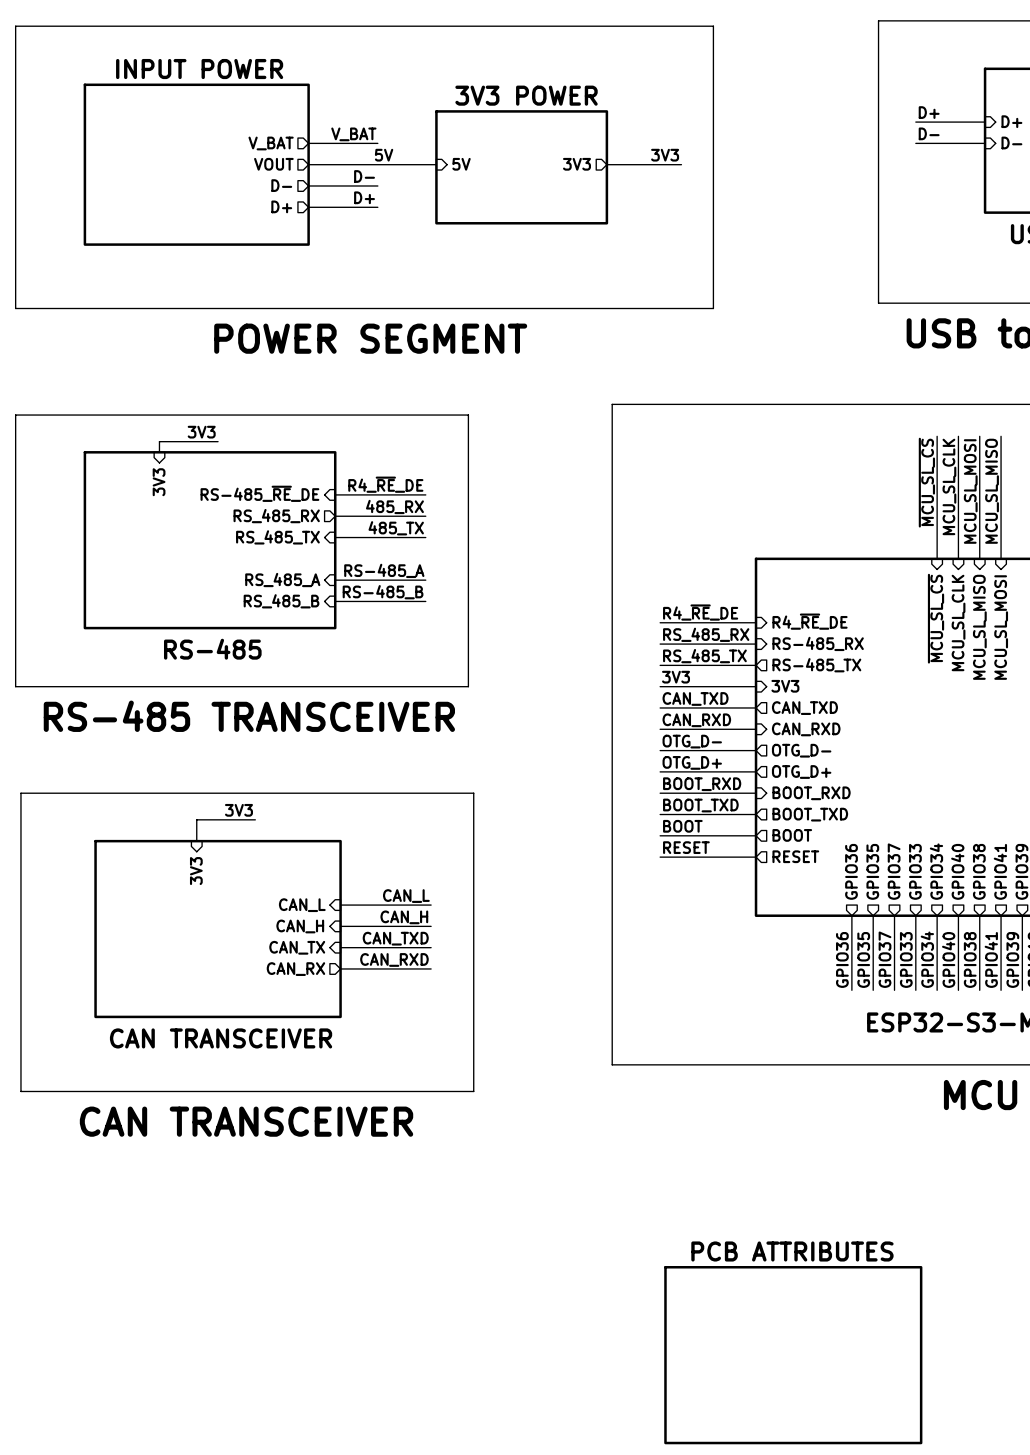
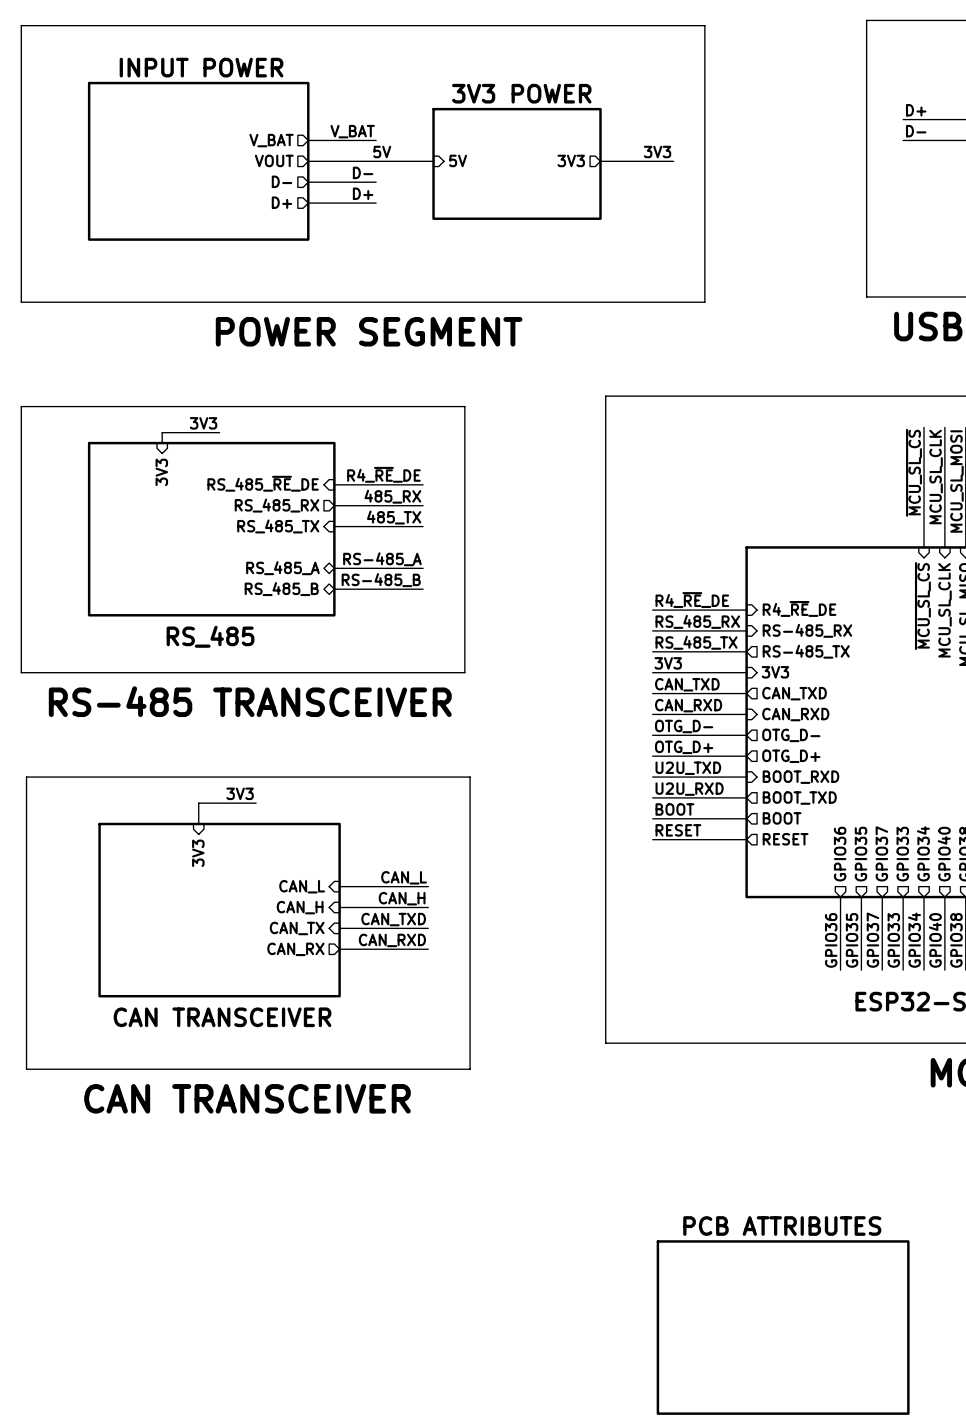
sheet pin: RS-485_~{RE}_DE (259, 493) -> RS_485_~{RE}_DE (263, 483)
sheet pin shape: input (282, 580) -> bidirectional (282, 568)
sheet pin shape: input (281, 601) -> bidirectional (281, 589)
sheet RS-485 name: RS-485 (212, 649) -> RS_485 (210, 636)
label: BOOT_RXD (702, 784) -> U2U_TXD (688, 768)
label: BOOT_TXD (700, 805) -> U2U_RXD (689, 789)

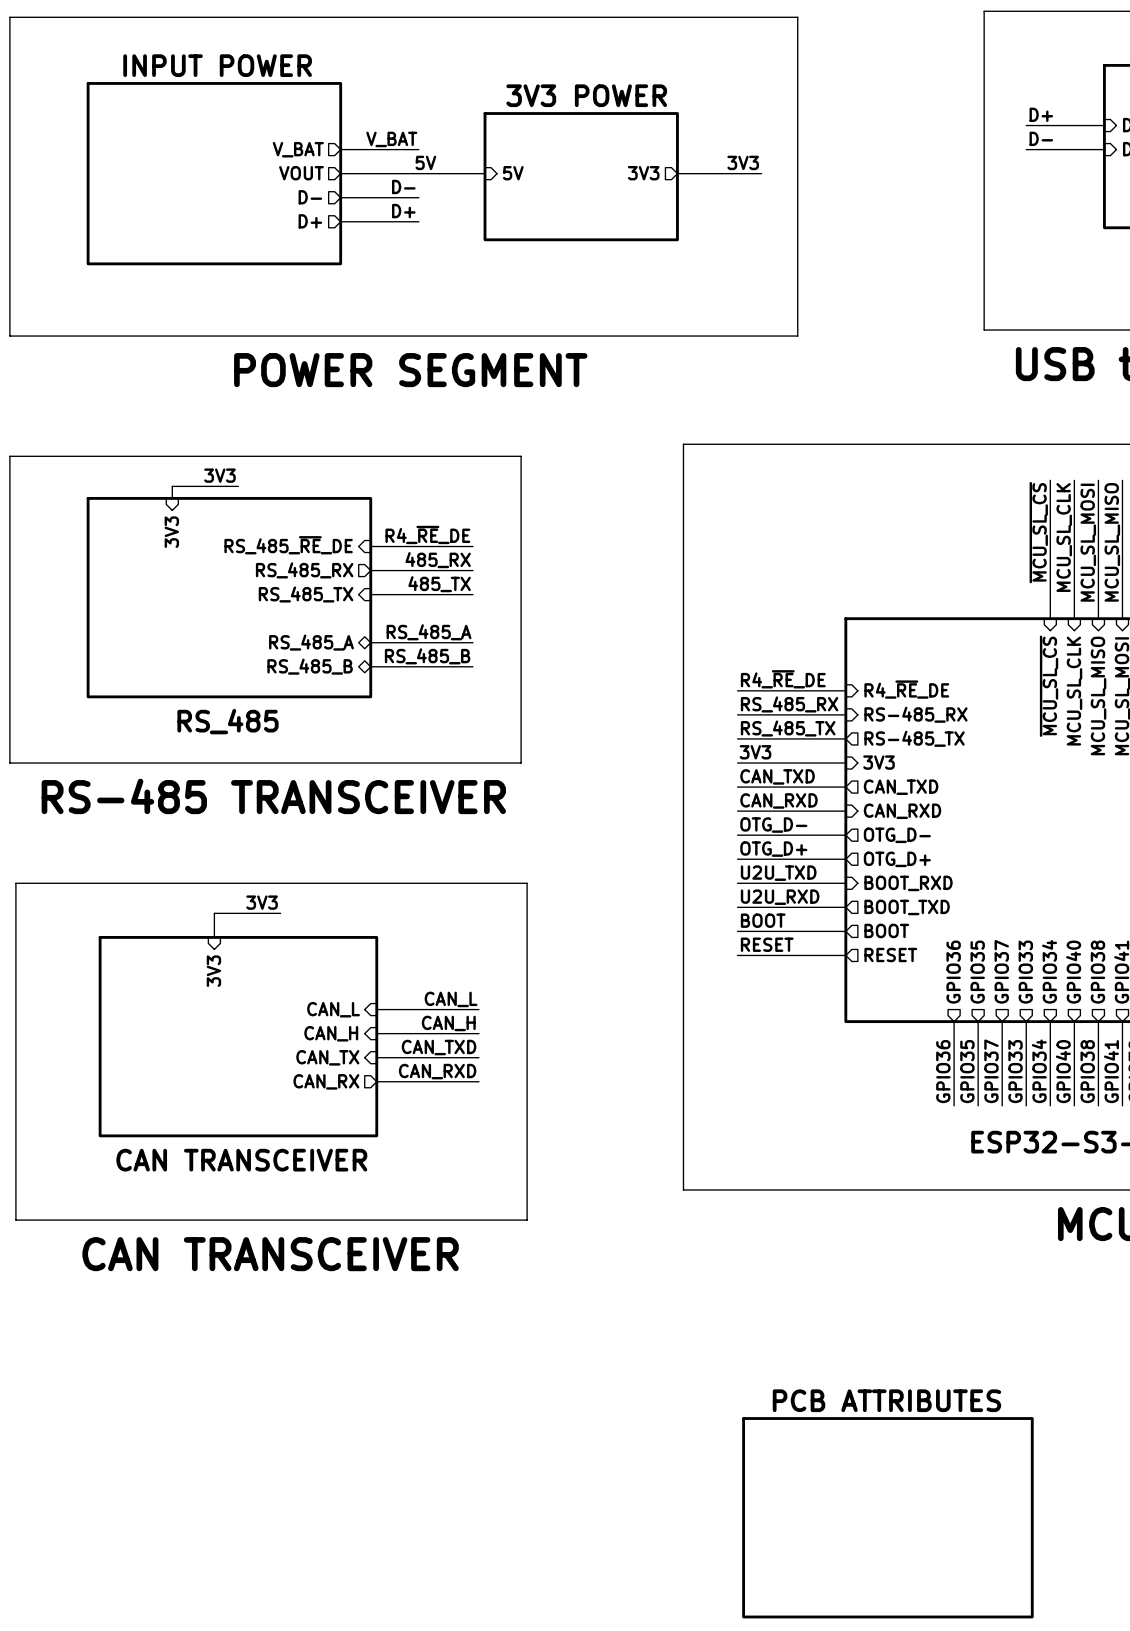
label: RS-485_A (382, 559) -> RS_485_A (429, 632)
label: RS-485_B (381, 580) -> RS_485_B (427, 656)

